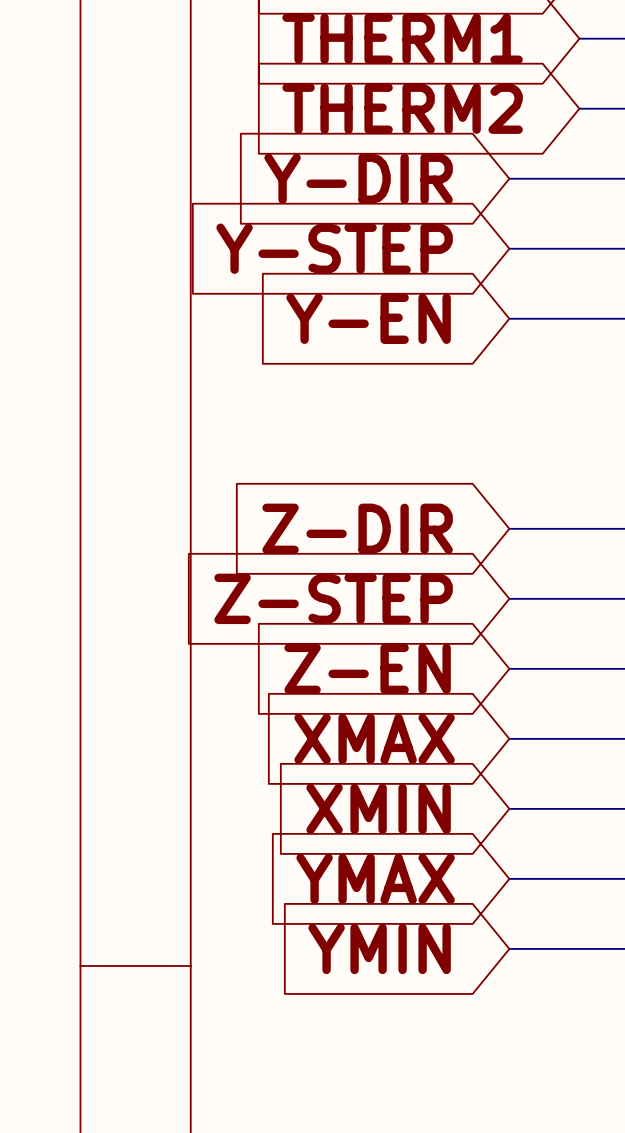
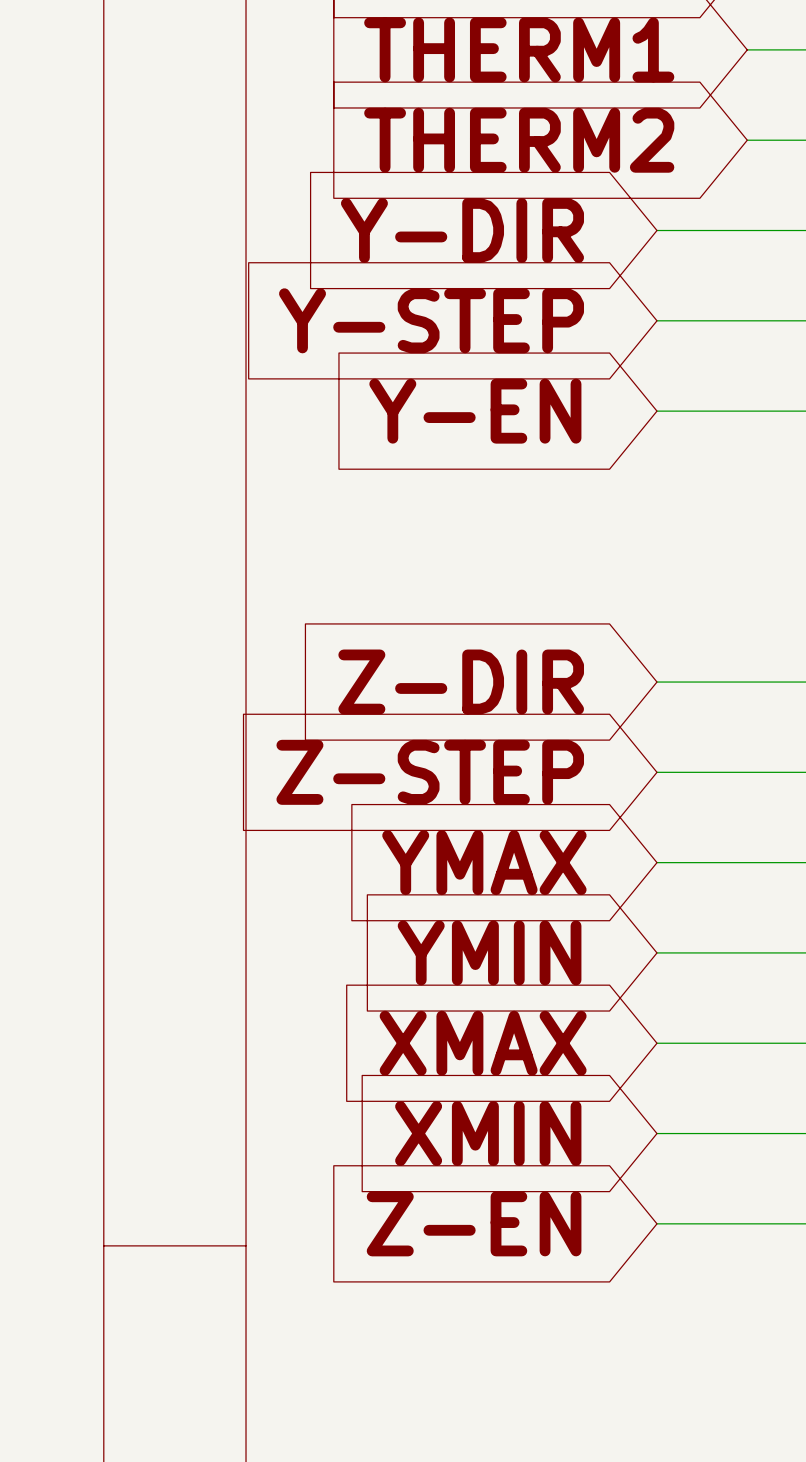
global label: Z-EN (367, 668) -> YMAX (484, 862)
global label: XMAX (374, 738) -> YMIN (489, 952)
global label: XMIN (378, 808) -> XMAX (483, 1043)
global label: YMAX (375, 878) -> XMIN (488, 1133)
global label: YMIN (379, 948) -> Z-EN (474, 1223)

